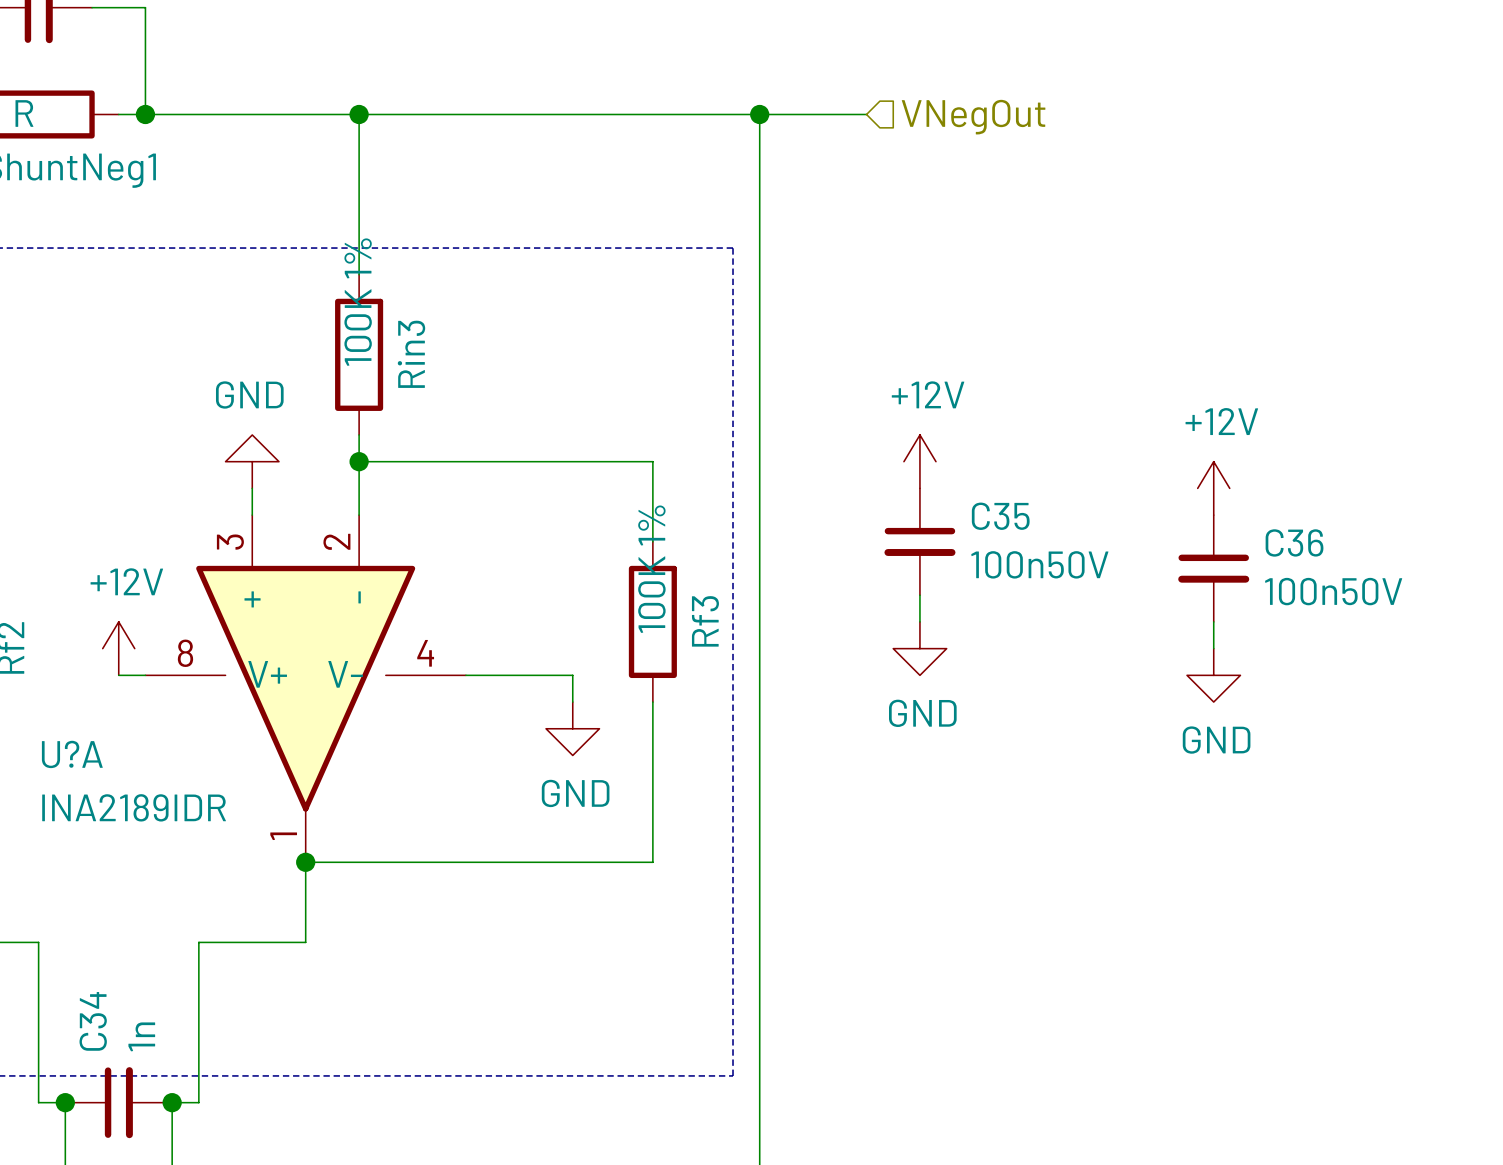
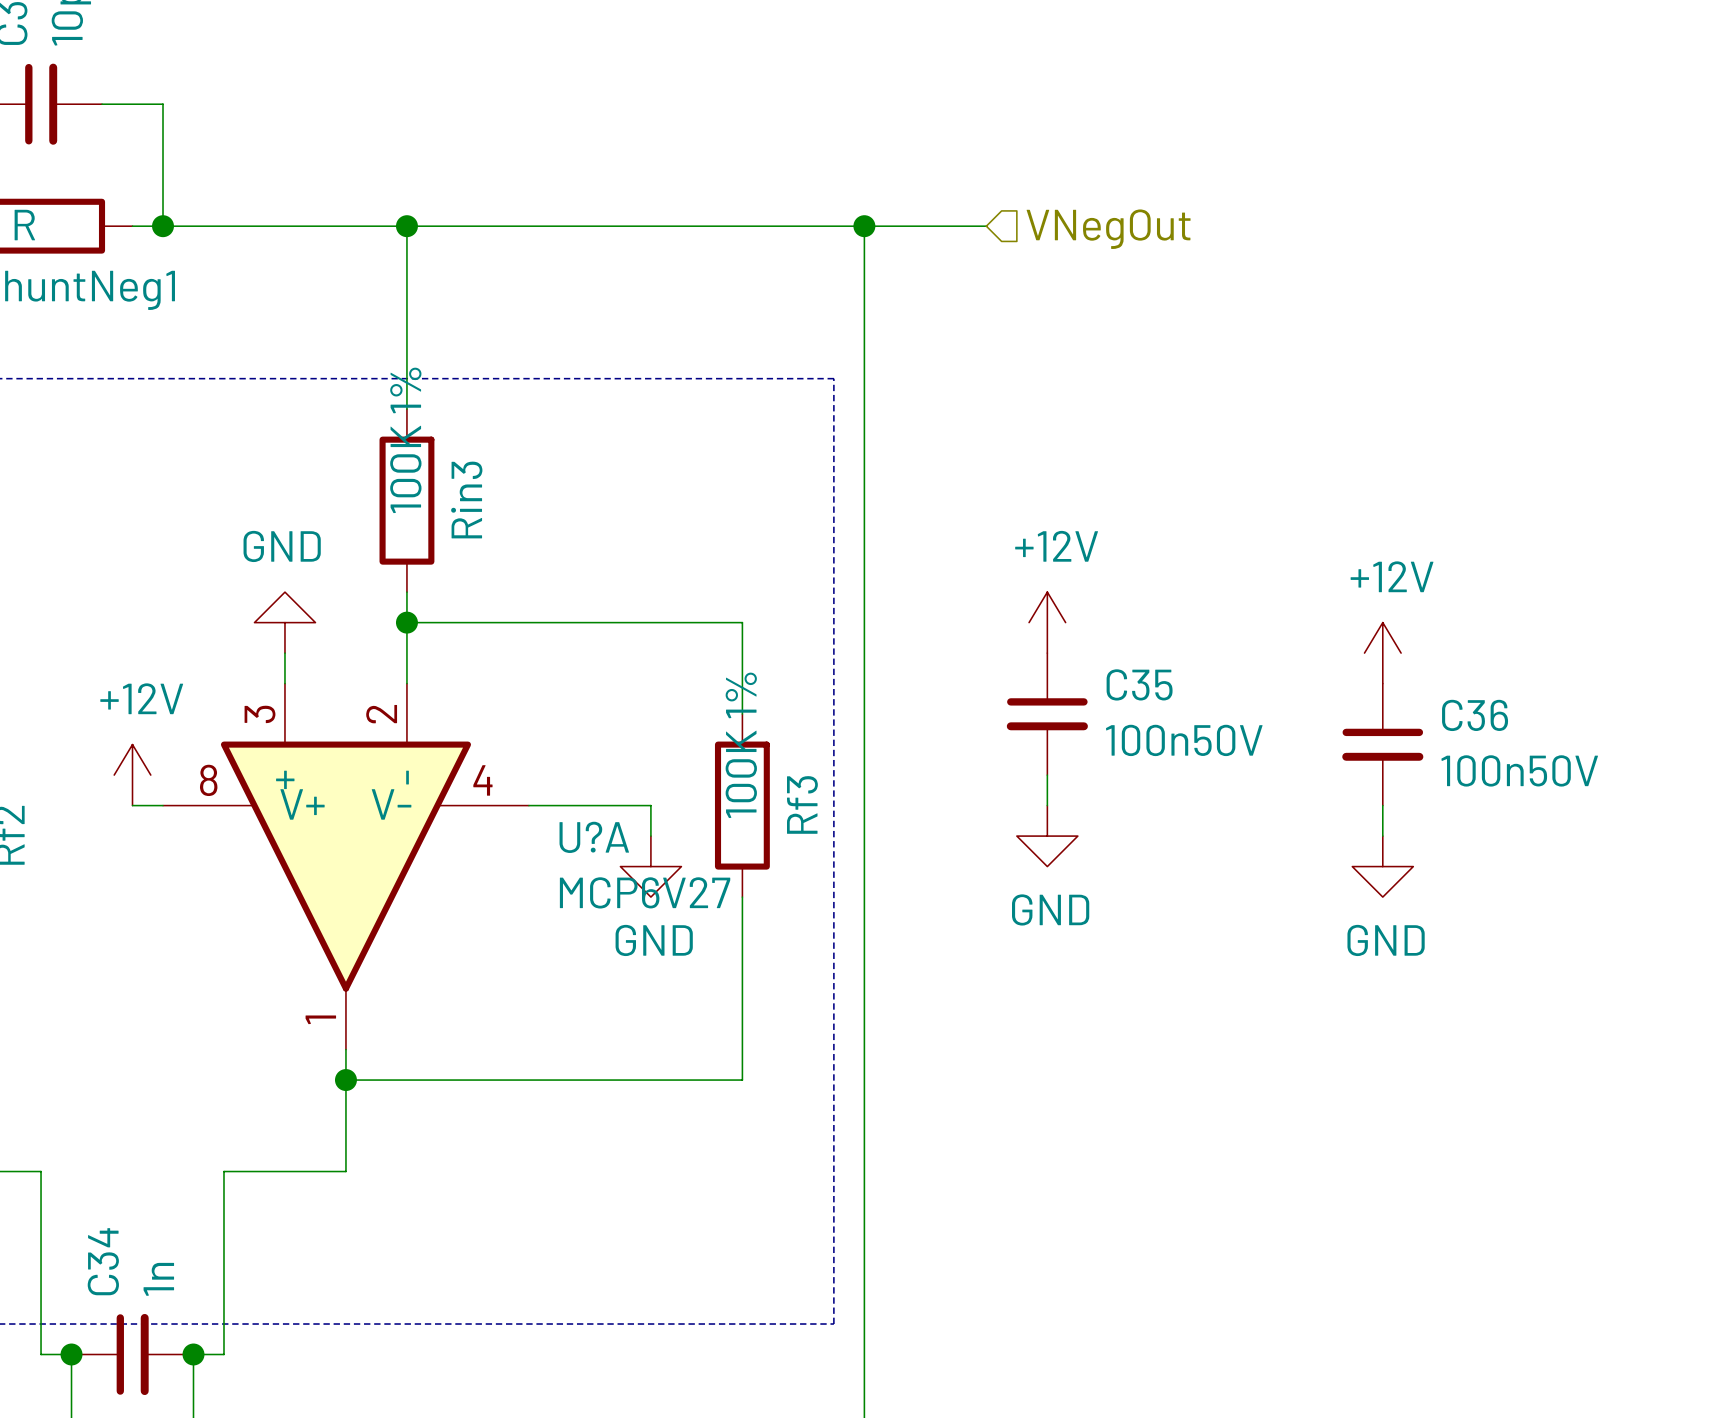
U?A symbol: [145, 515, 466, 863] -> [163, 683, 529, 1050]
power symbol position: +12V (118, 648) -> +12V (132, 775)
wire: (118, 675) (145, 675) -> (132, 805) (163, 805)
wire: (465, 675) (572, 675) (572, 702) -> (528, 805) (650, 805) (650, 836)
power symbol position: GND (572, 728) -> GND (650, 866)
U?A name position: U?A (72, 754) -> U?A (594, 837)
U?A value: INA2189IDR (134, 807) -> MCP6V27 (645, 892)

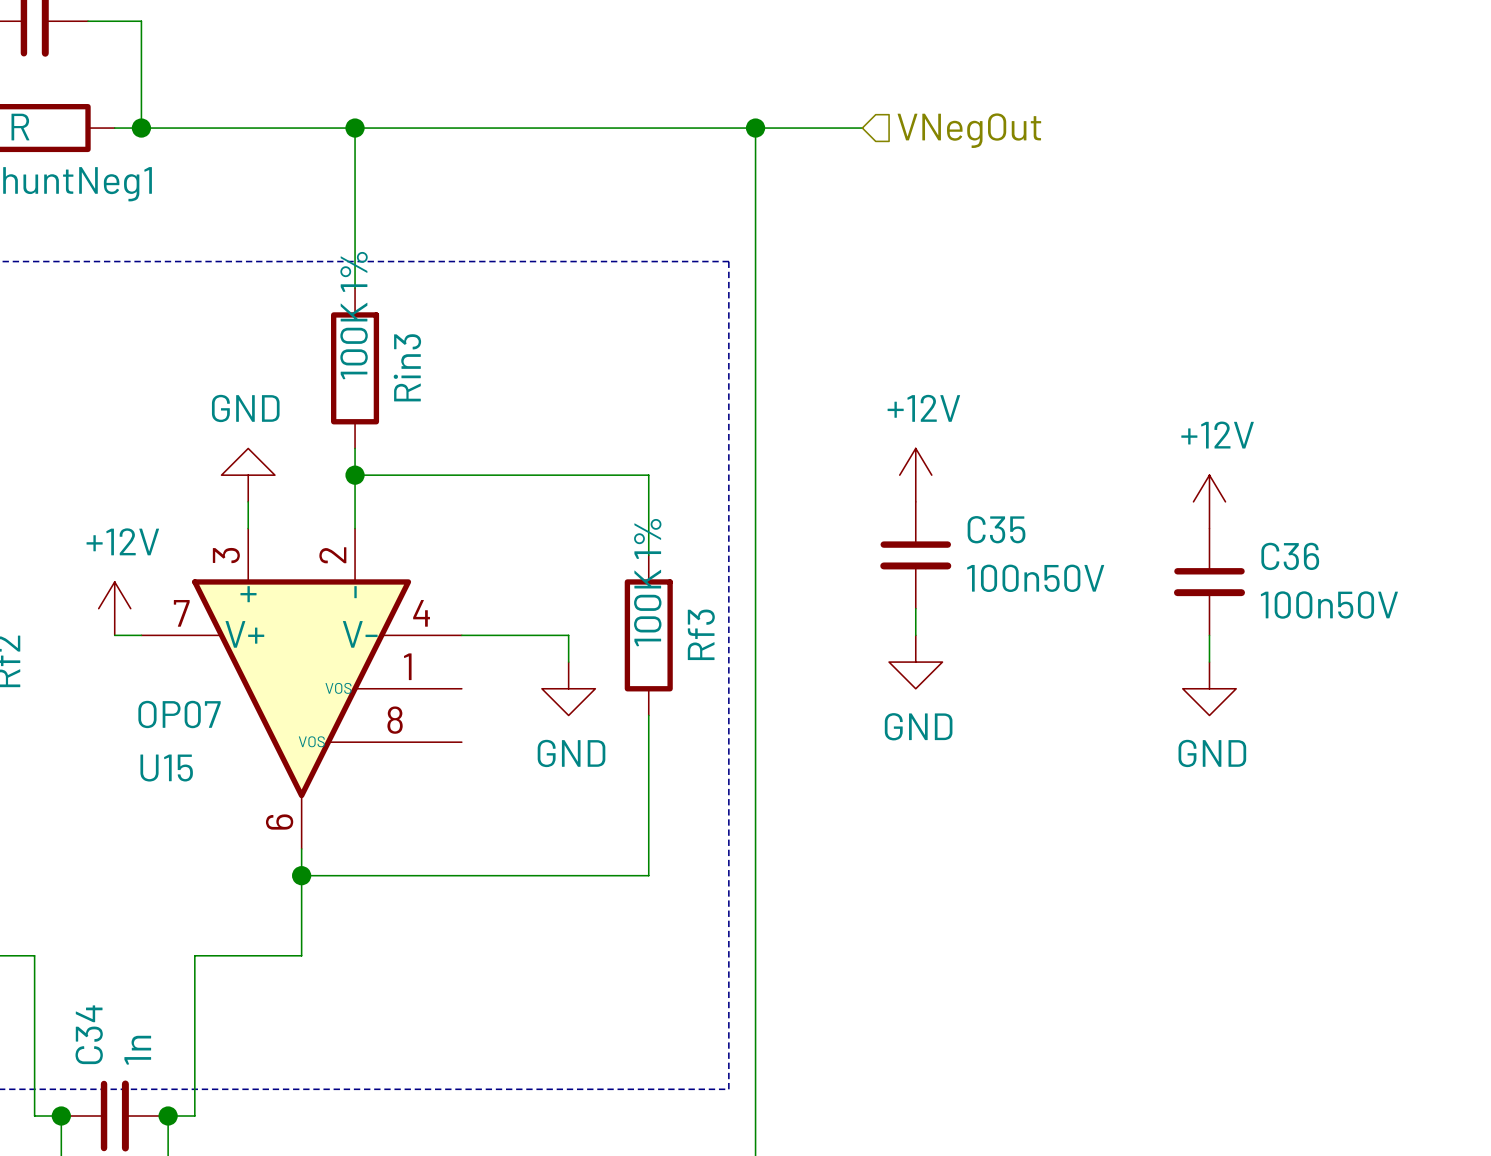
U?A: MCP6V27 (345, 866) -> none
U15: none -> OP07 (301, 688)

